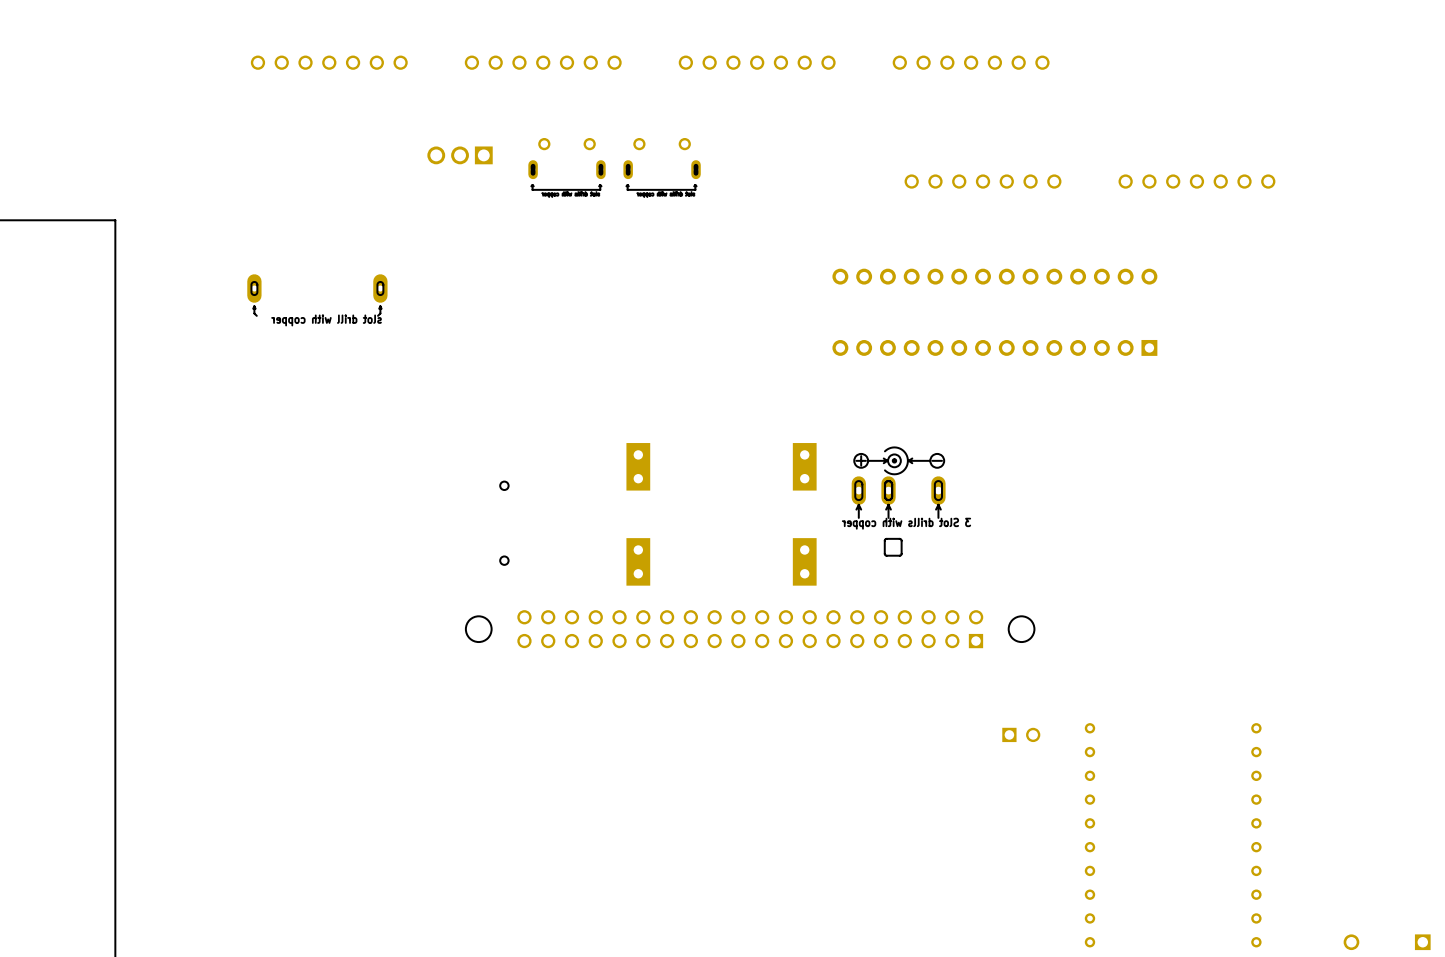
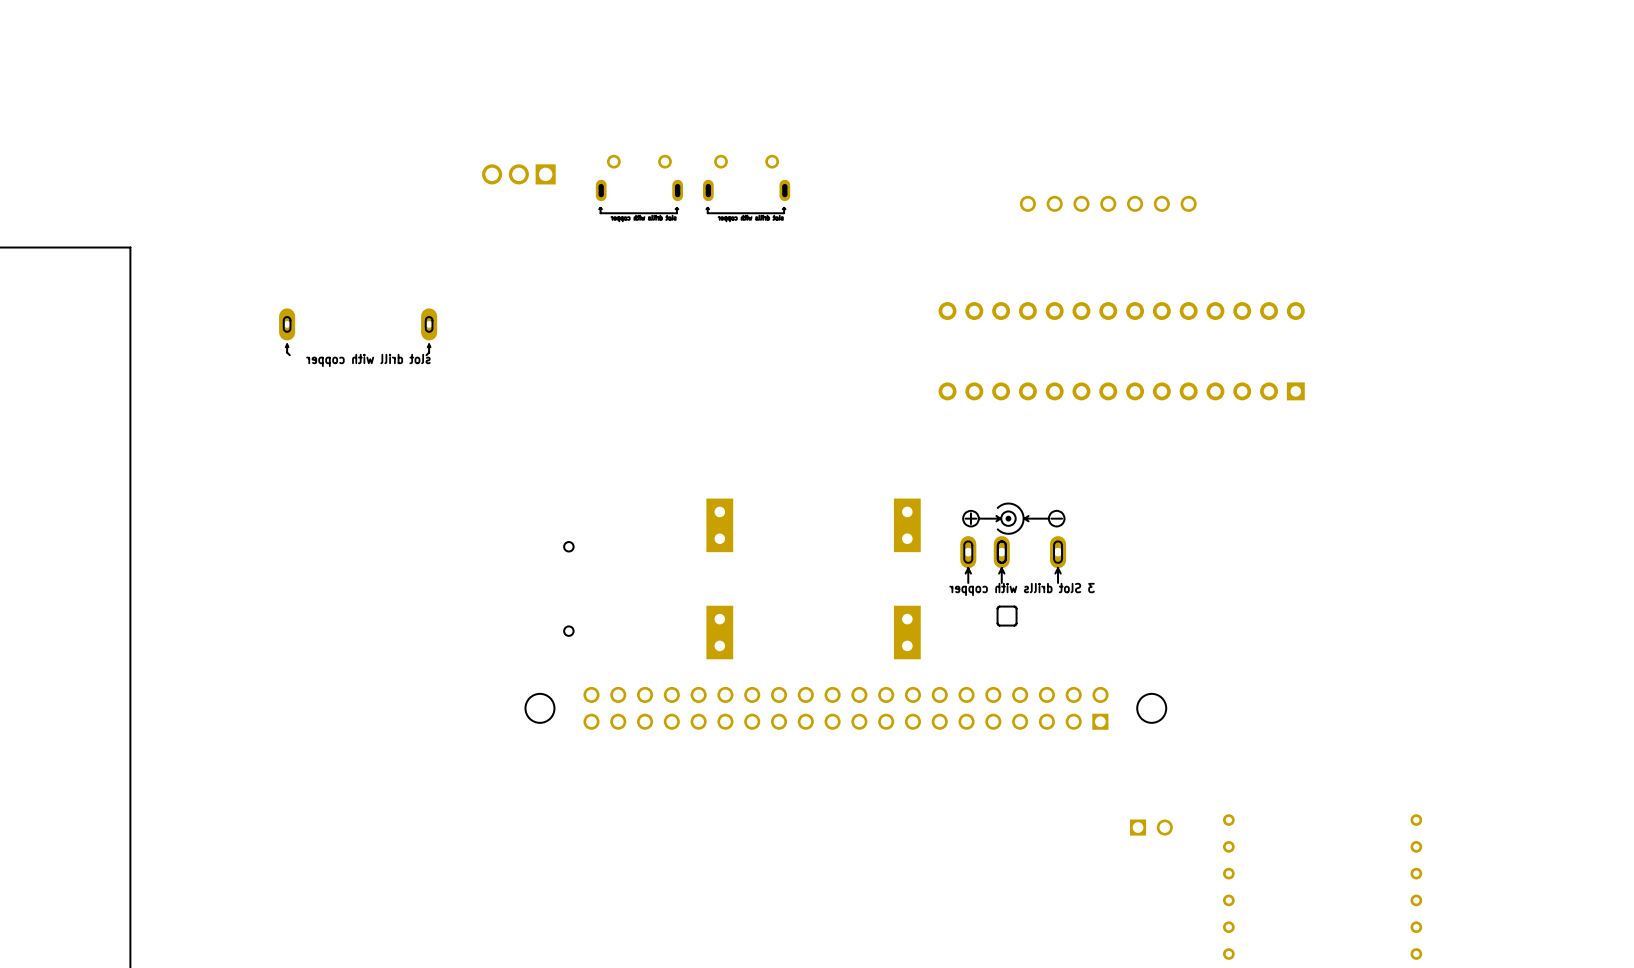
part: (329, 62) -> none
part: (543, 62) -> none
part: (757, 62) -> none
part: (971, 62) -> none
part: (1196, 181) -> none

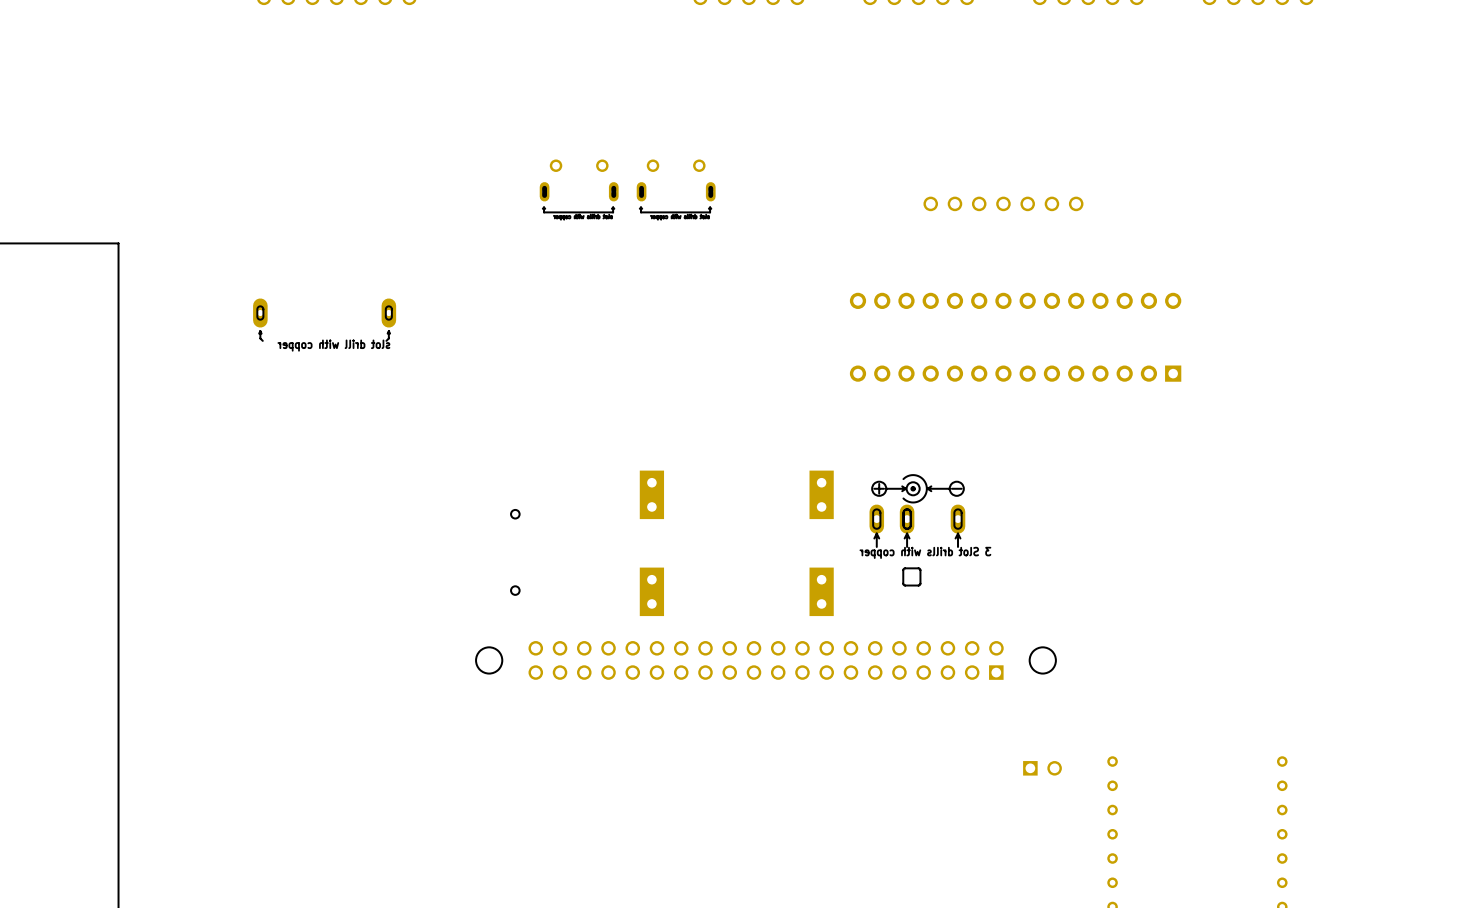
part: (518, 174) -> none

